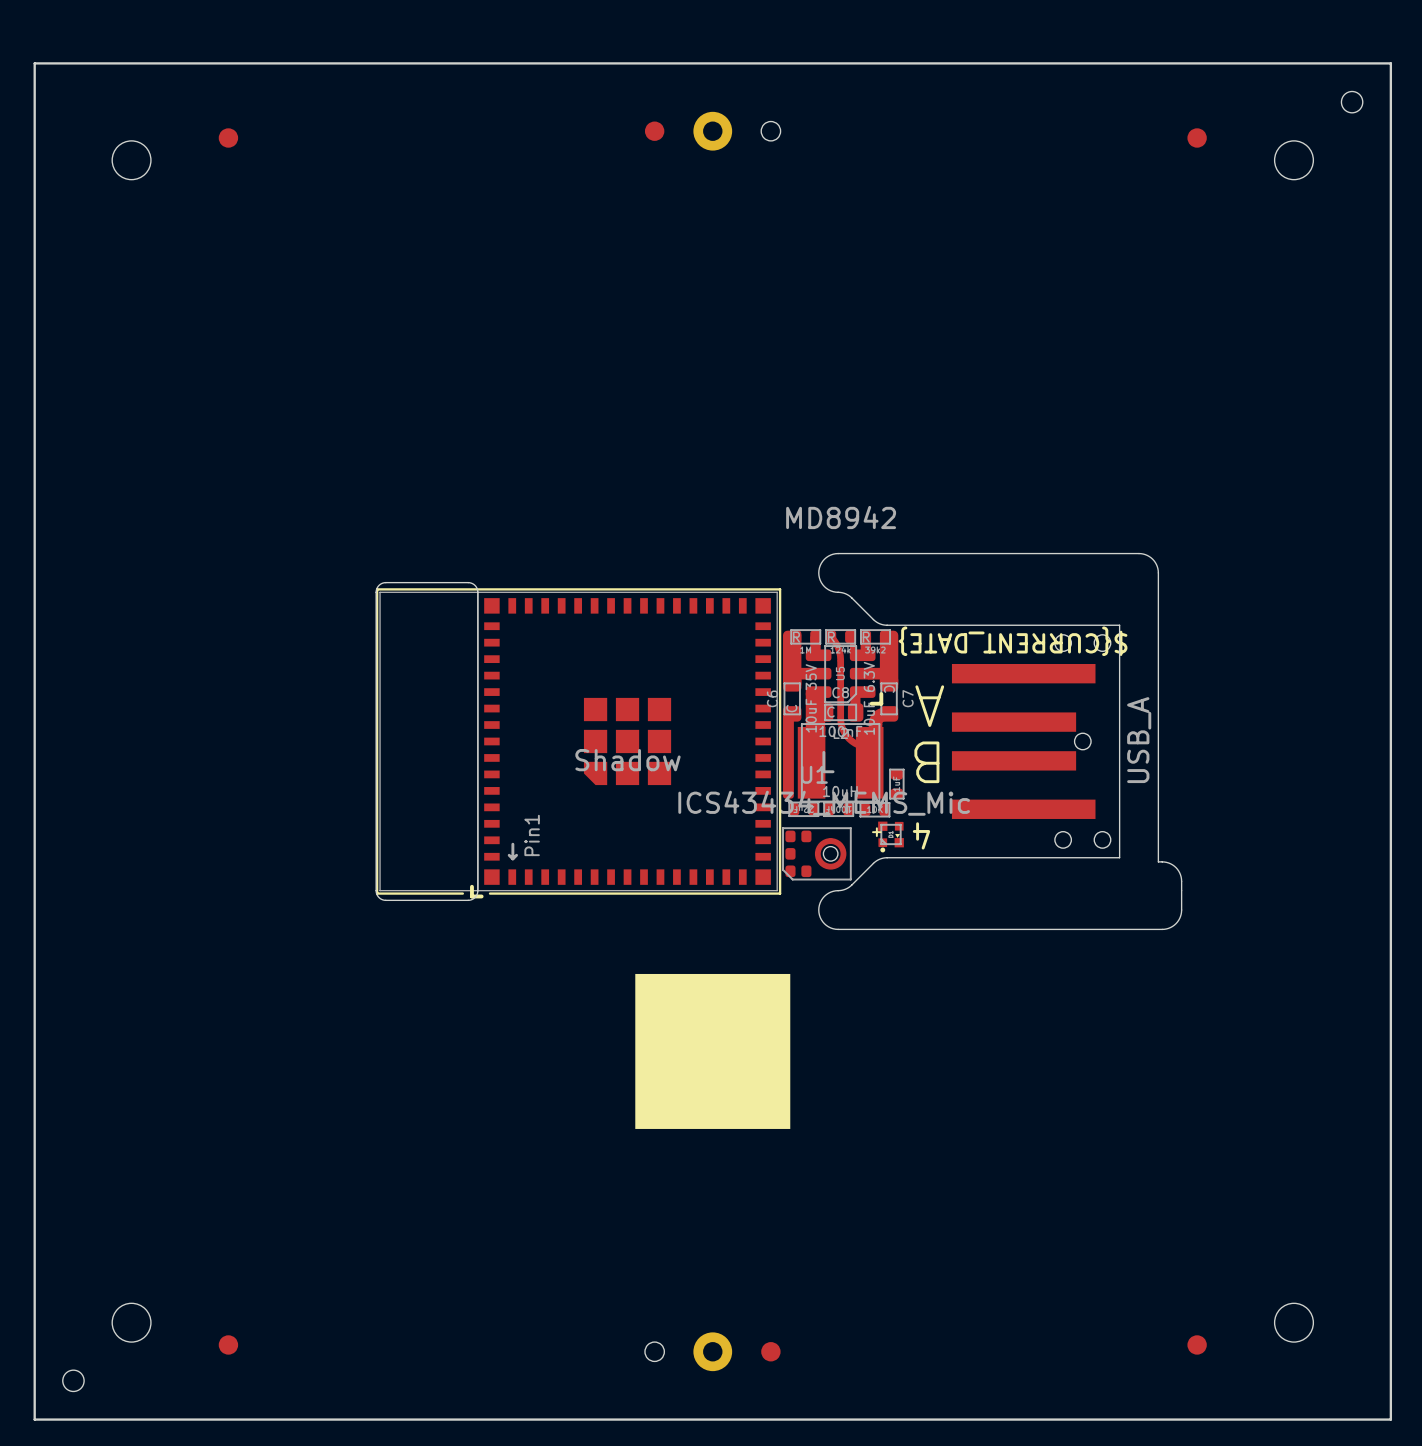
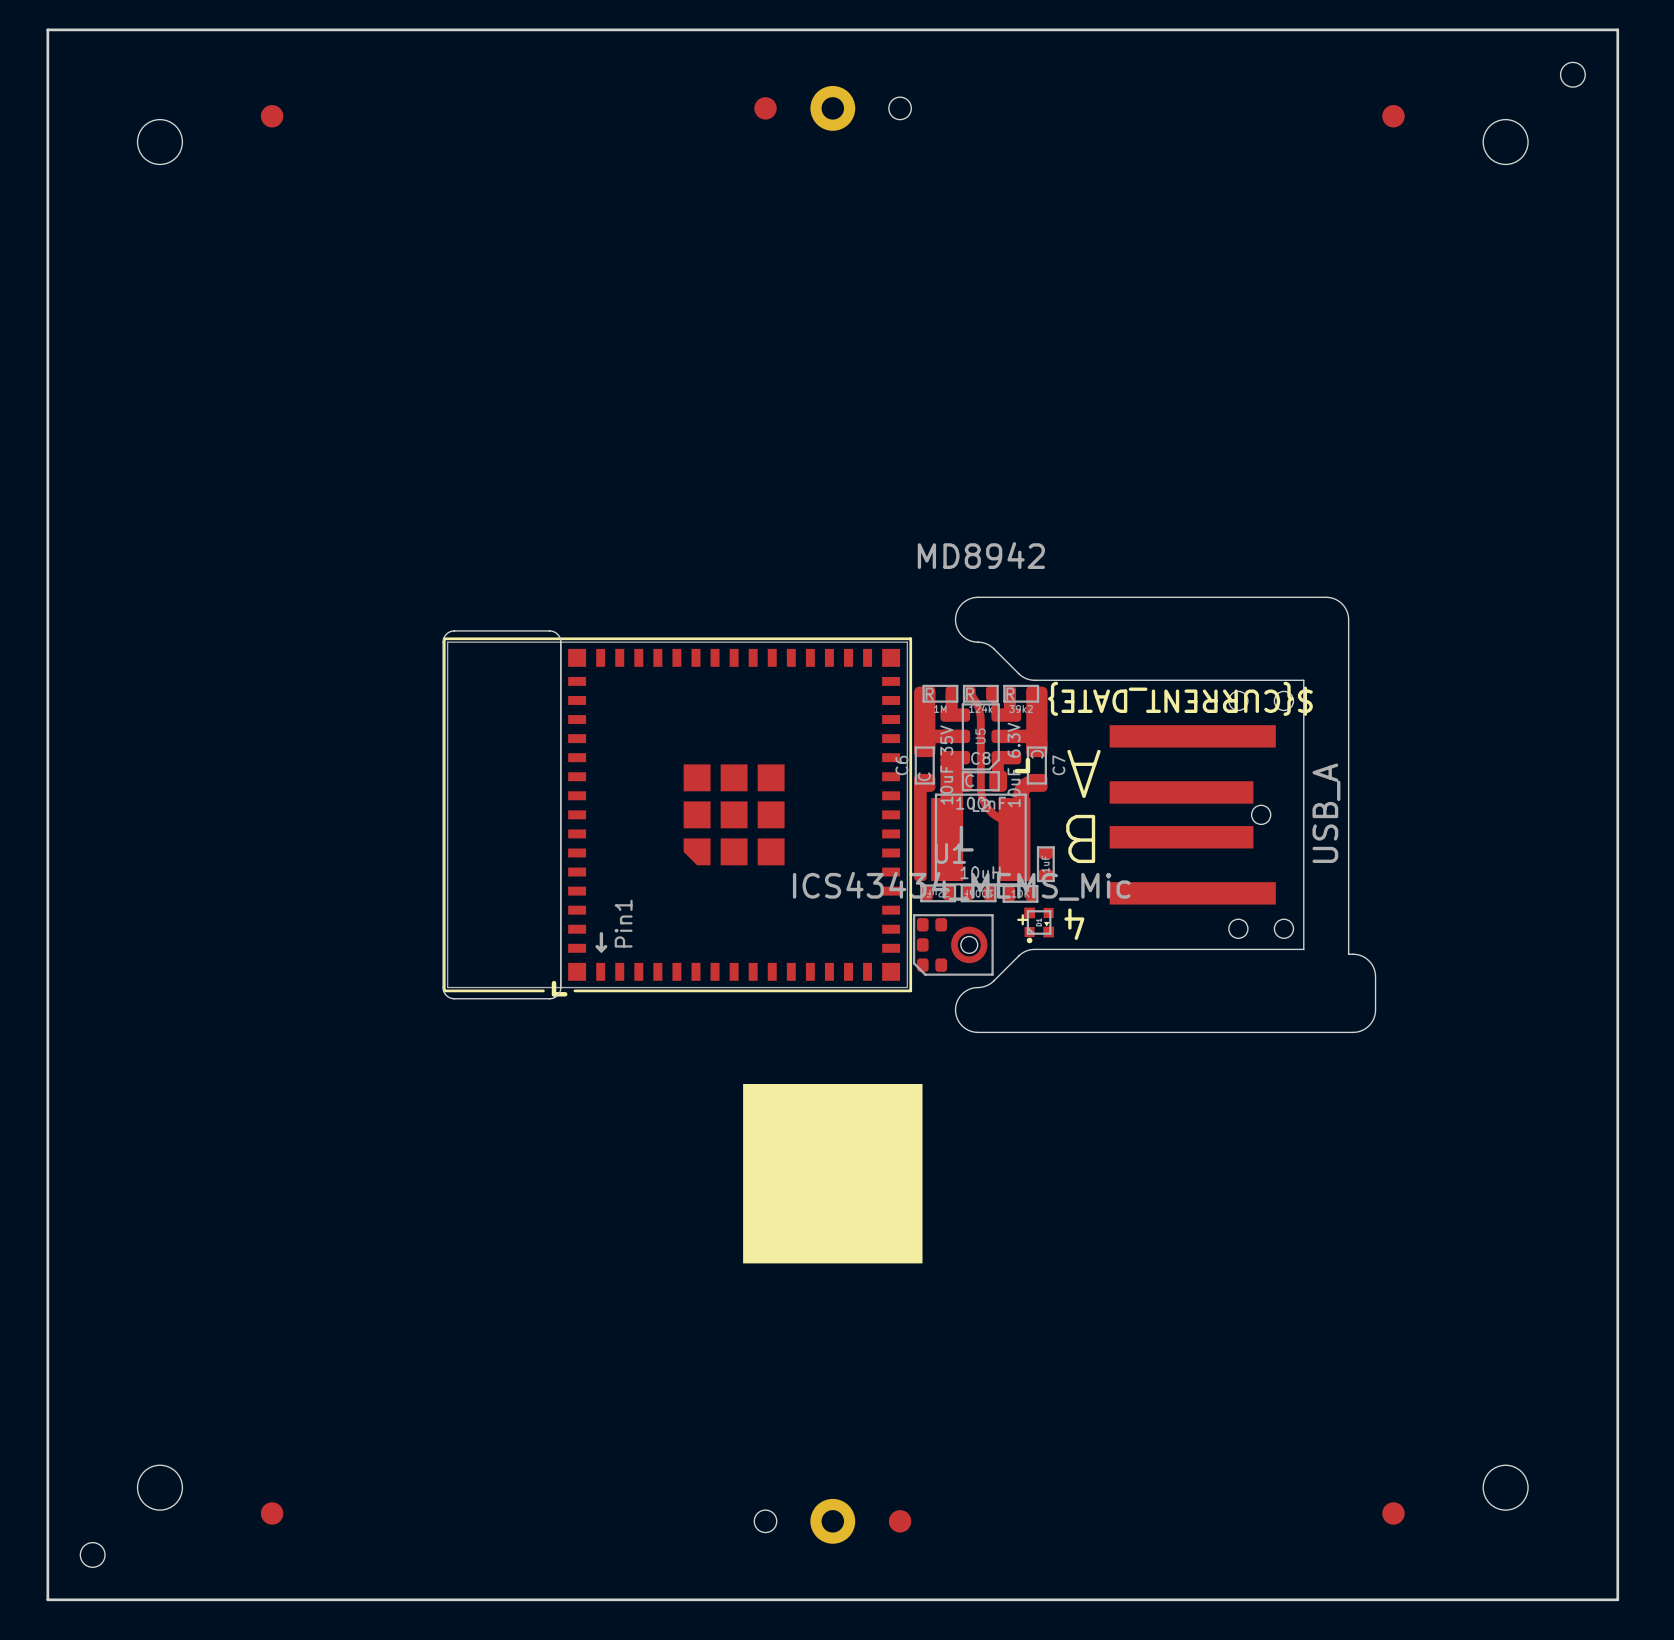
drawing: [575, 748, 681, 772] -> none

